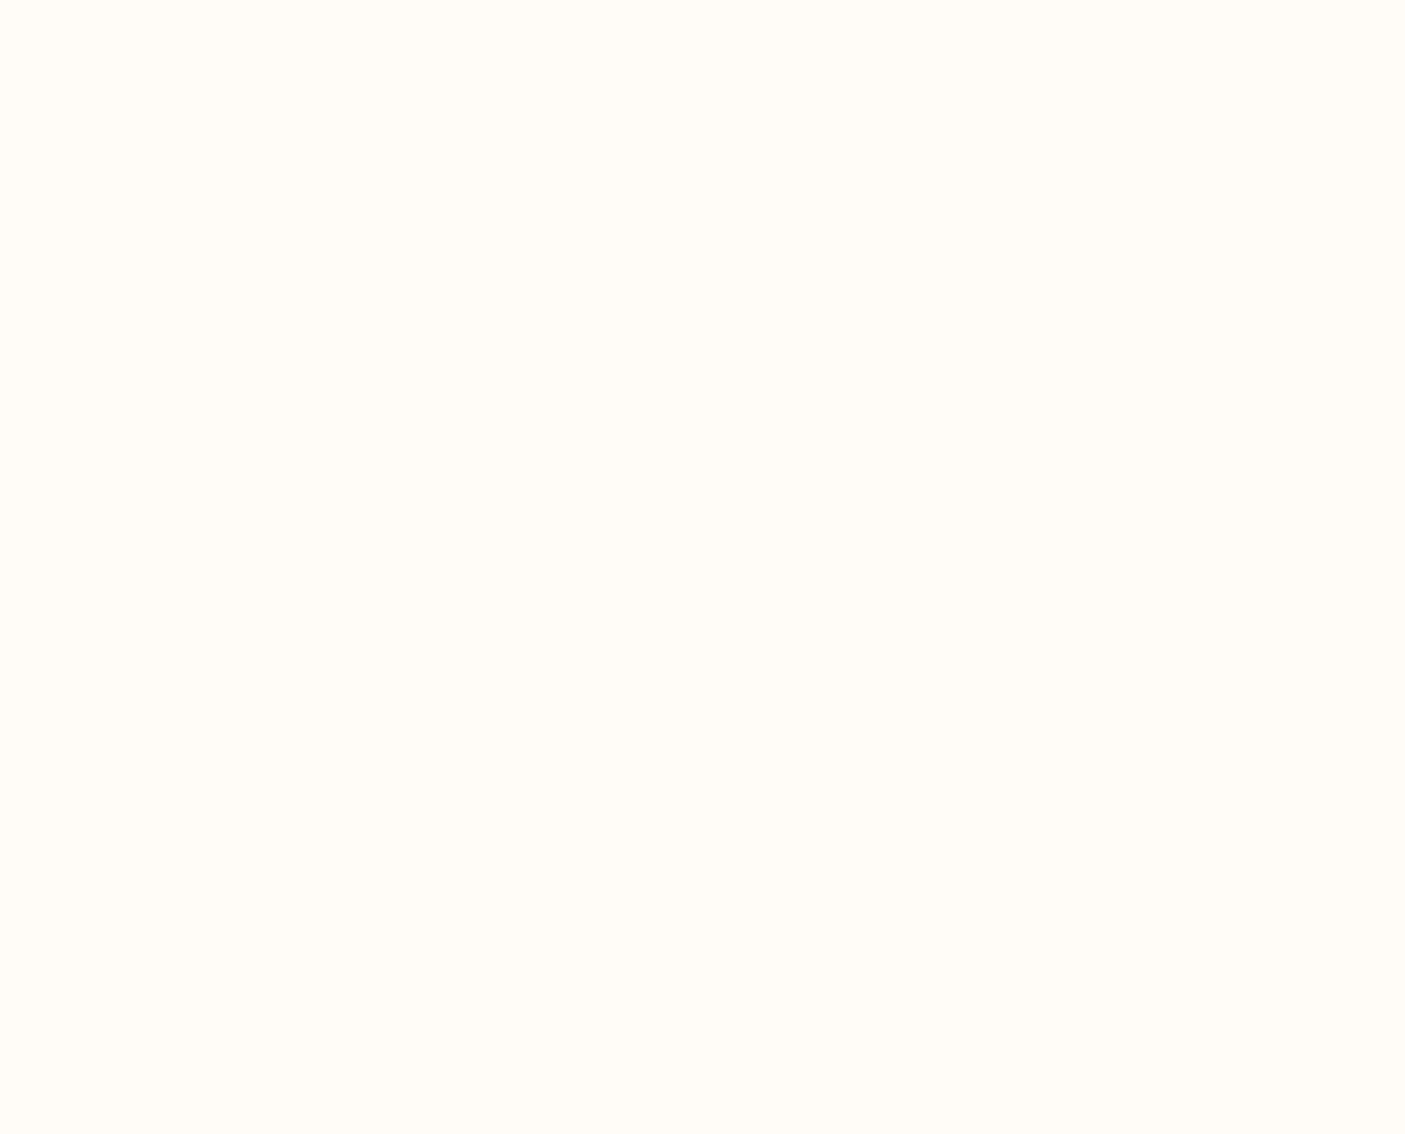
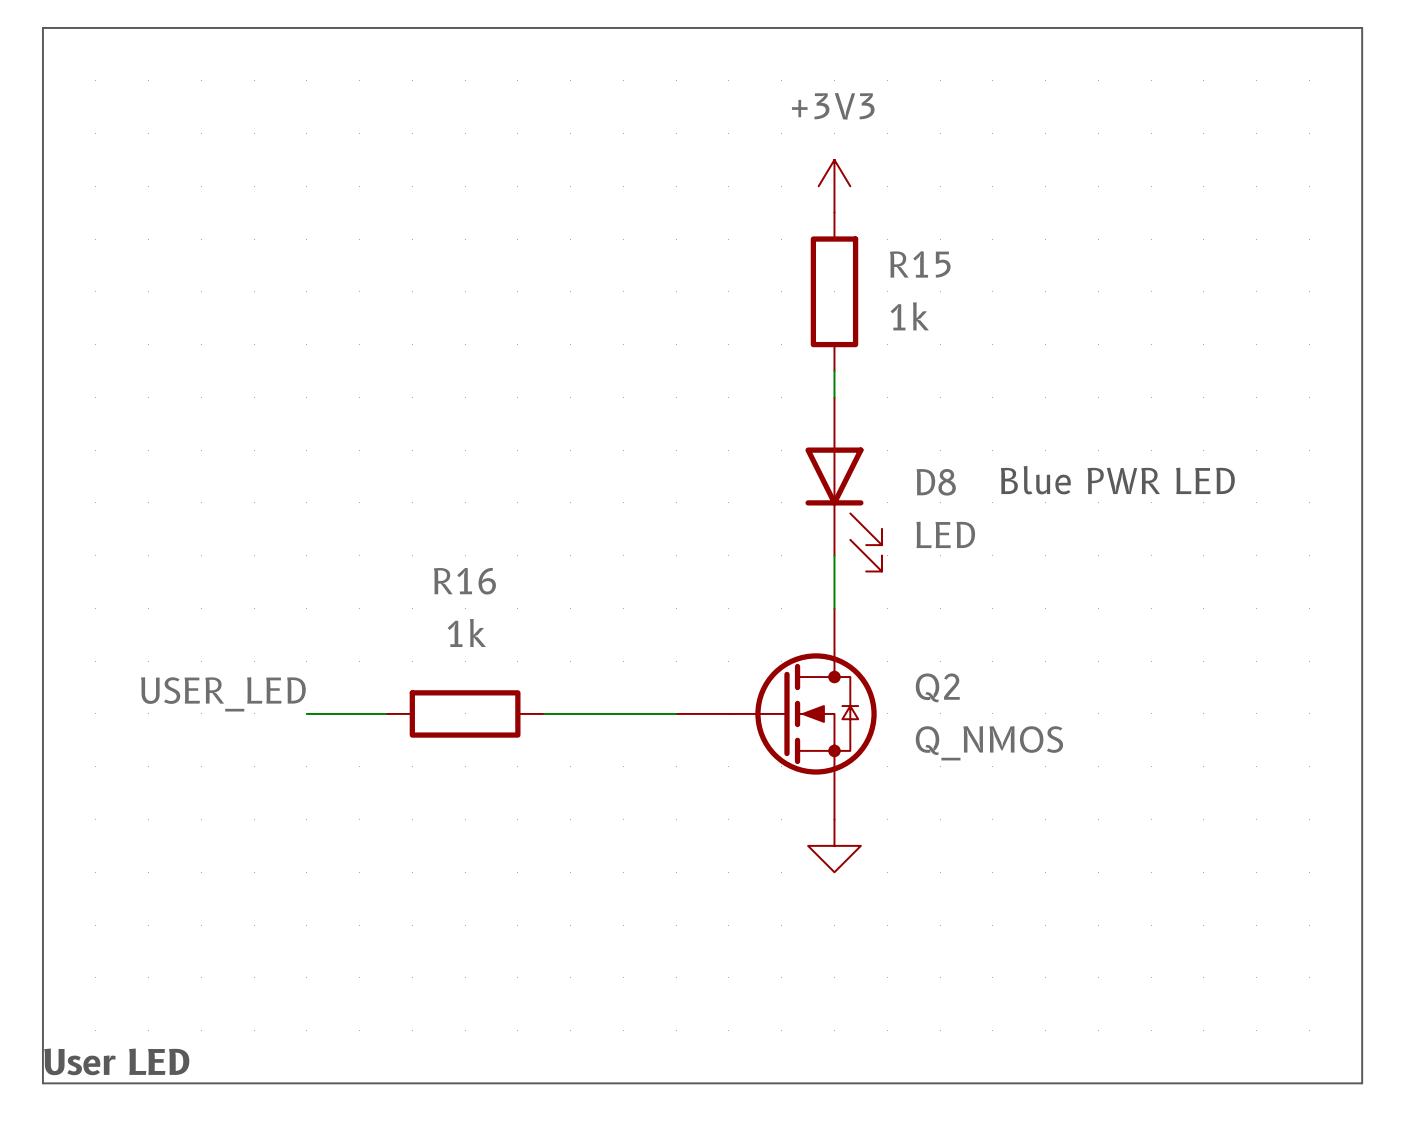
line: none -> (42, 27) (1362, 27) (1362, 1083) (42, 1083) (42, 27)
power symbol: none -> +3V3 (834, 186)
R15: none -> 1k (834, 291)
wire: none -> (834, 370) (834, 397)
text: none -> Blue PWR LED (1117, 480)
D8: none -> LED (843, 484)
wire: none -> (834, 555) (834, 608)
label: none -> USER_LED (223, 694)
wire: none -> (306, 713) (385, 713)
R16: none -> 1k (465, 713)
wire: none -> (544, 713) (676, 713)
Q2: none -> Q_NMOS (776, 713)
power symbol: none -> (834, 845)
text: none -> User LED (116, 1061)

